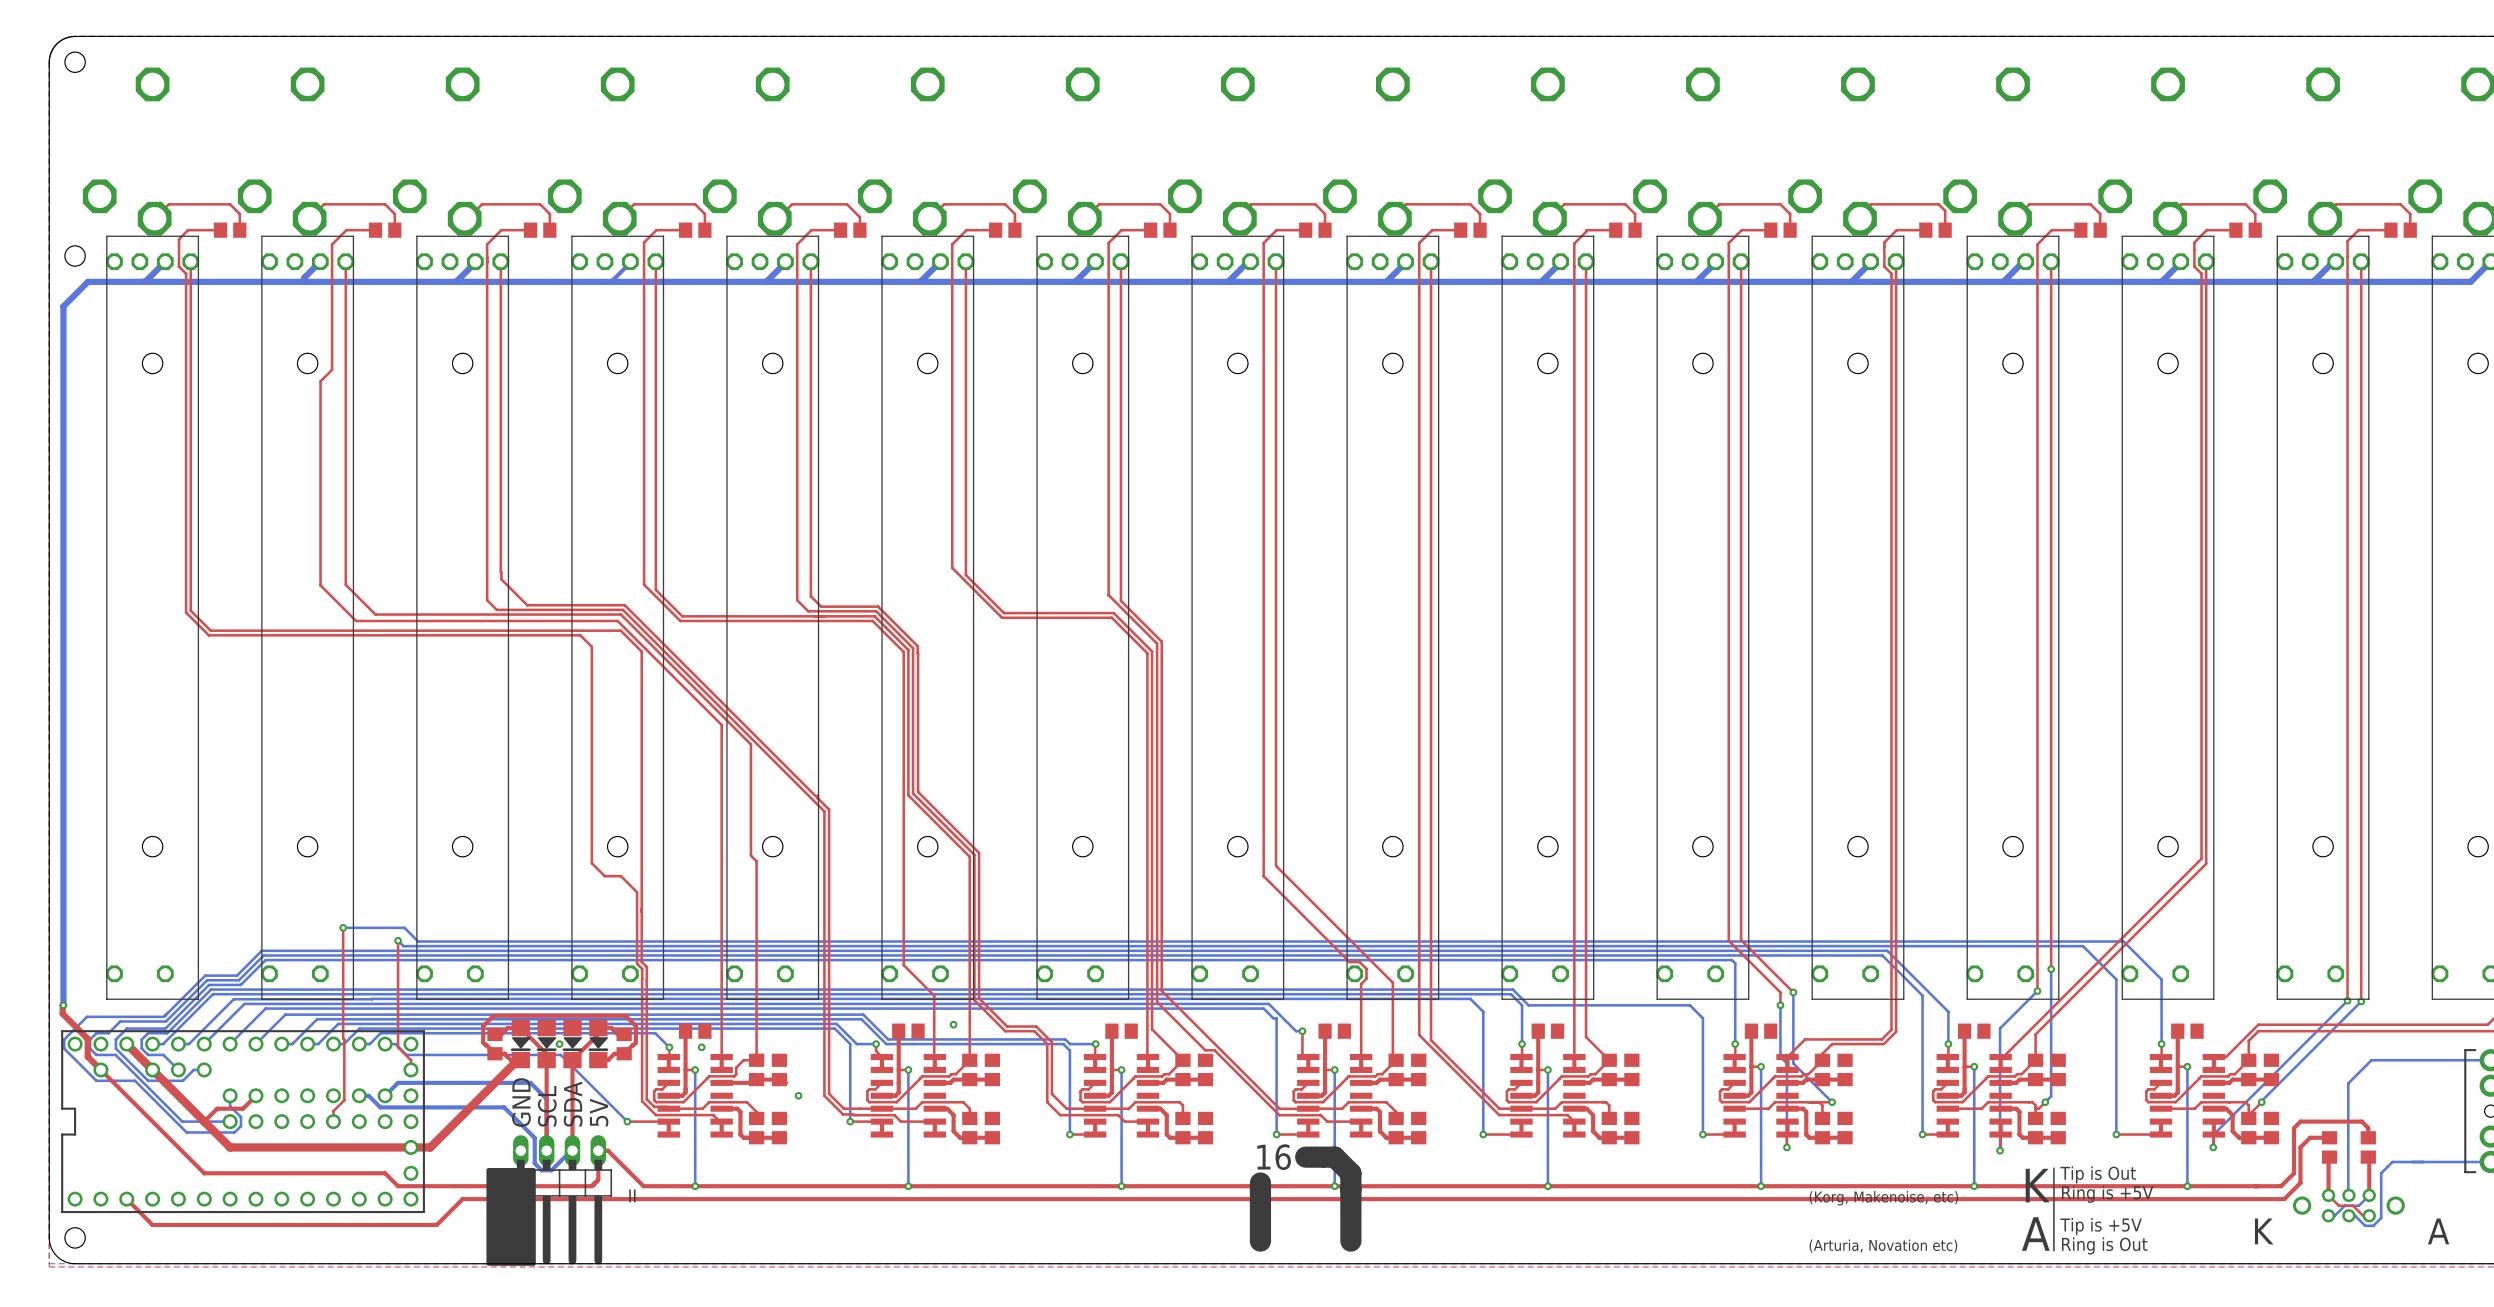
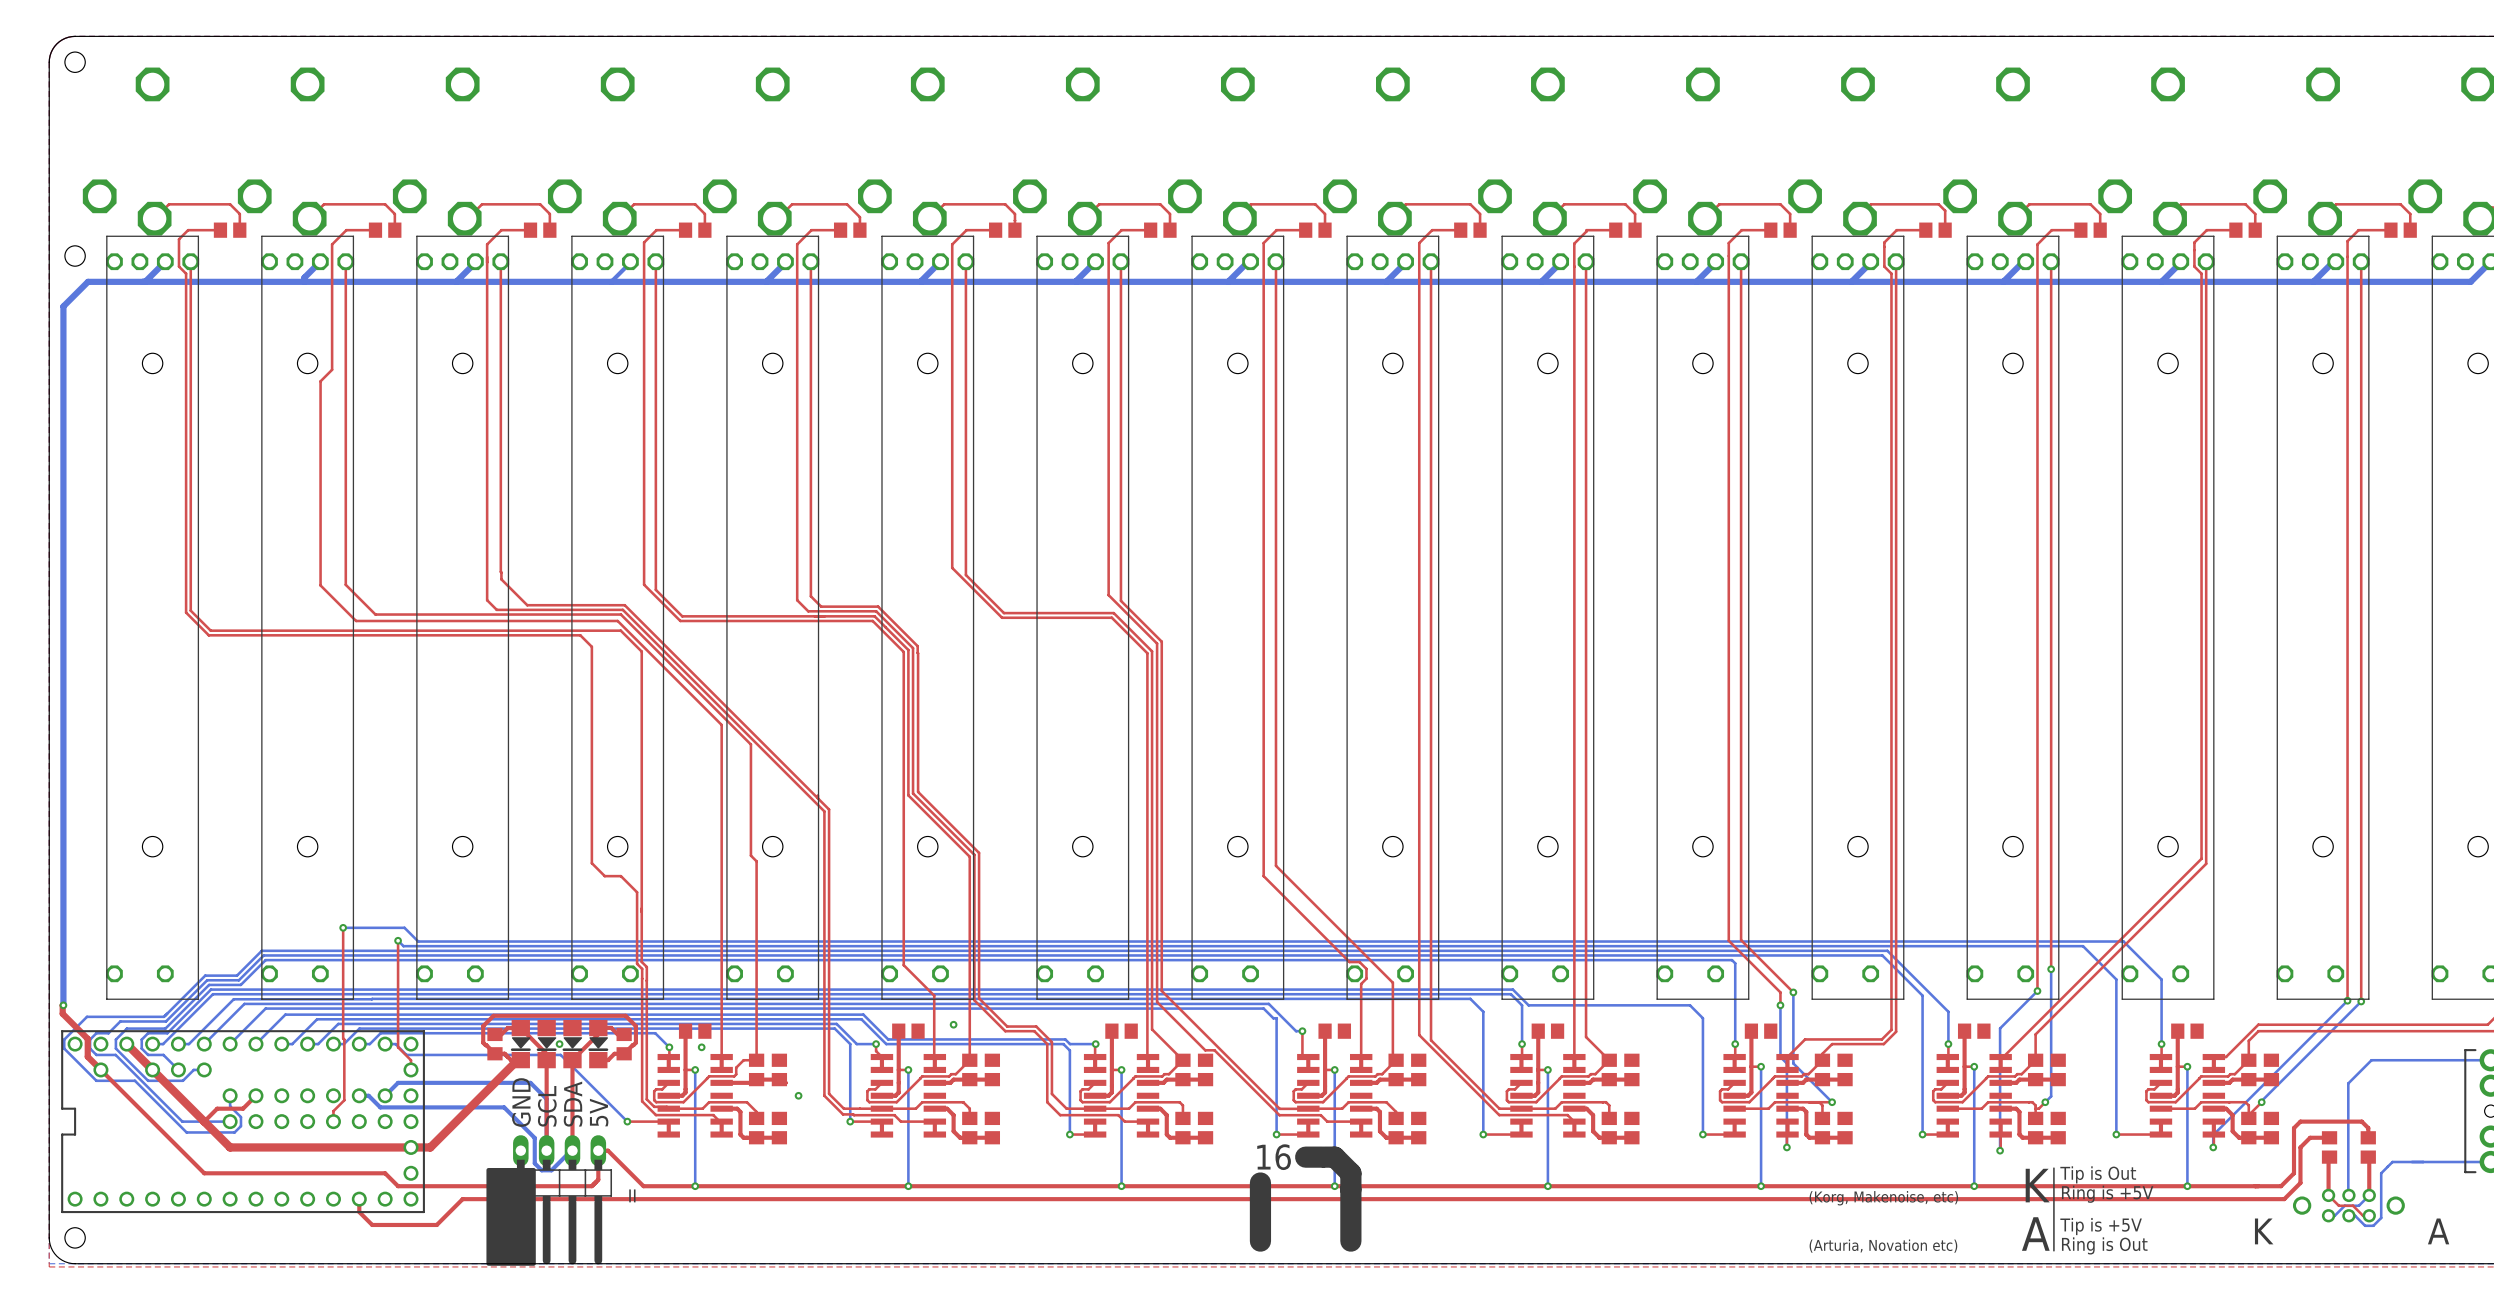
top track: (126, 1199) (152, 1224) (372, 1224) -> (359, 1199) (359, 1212) (372, 1224)

